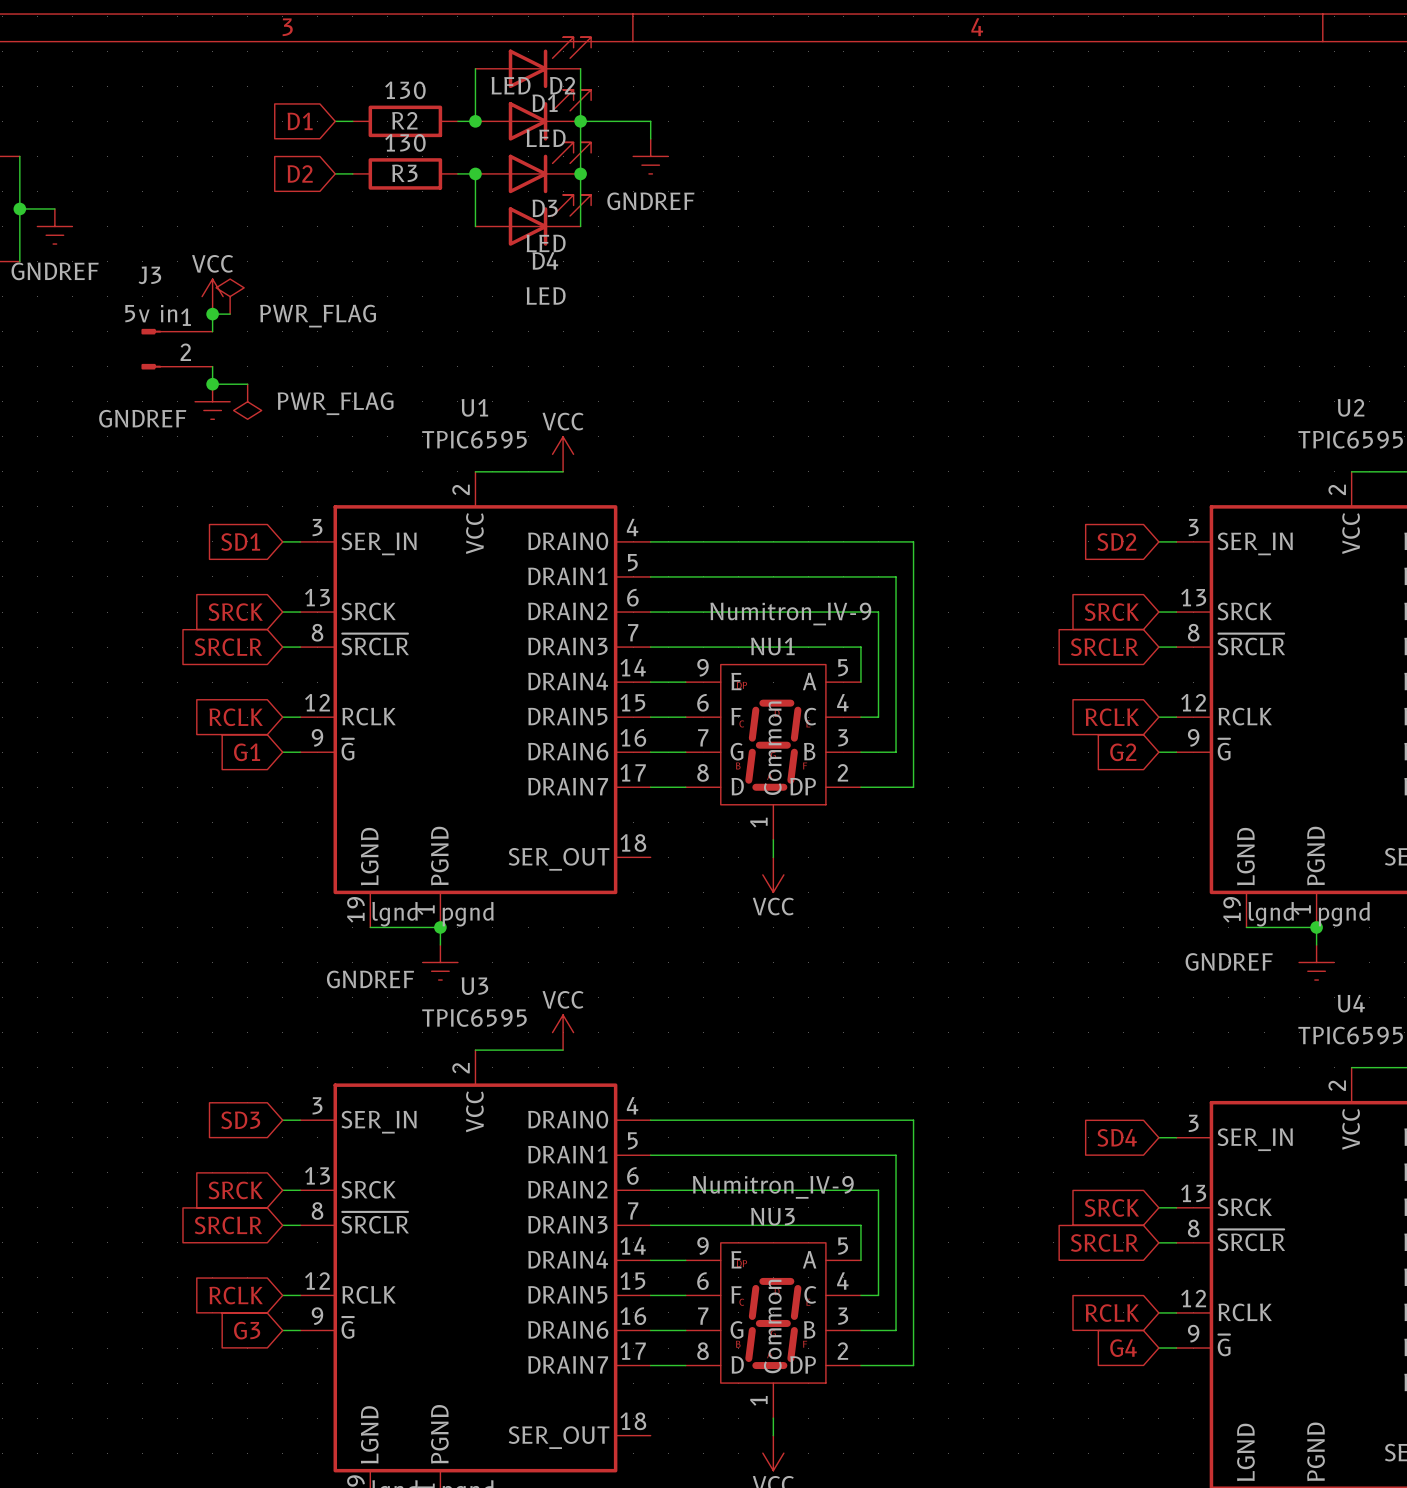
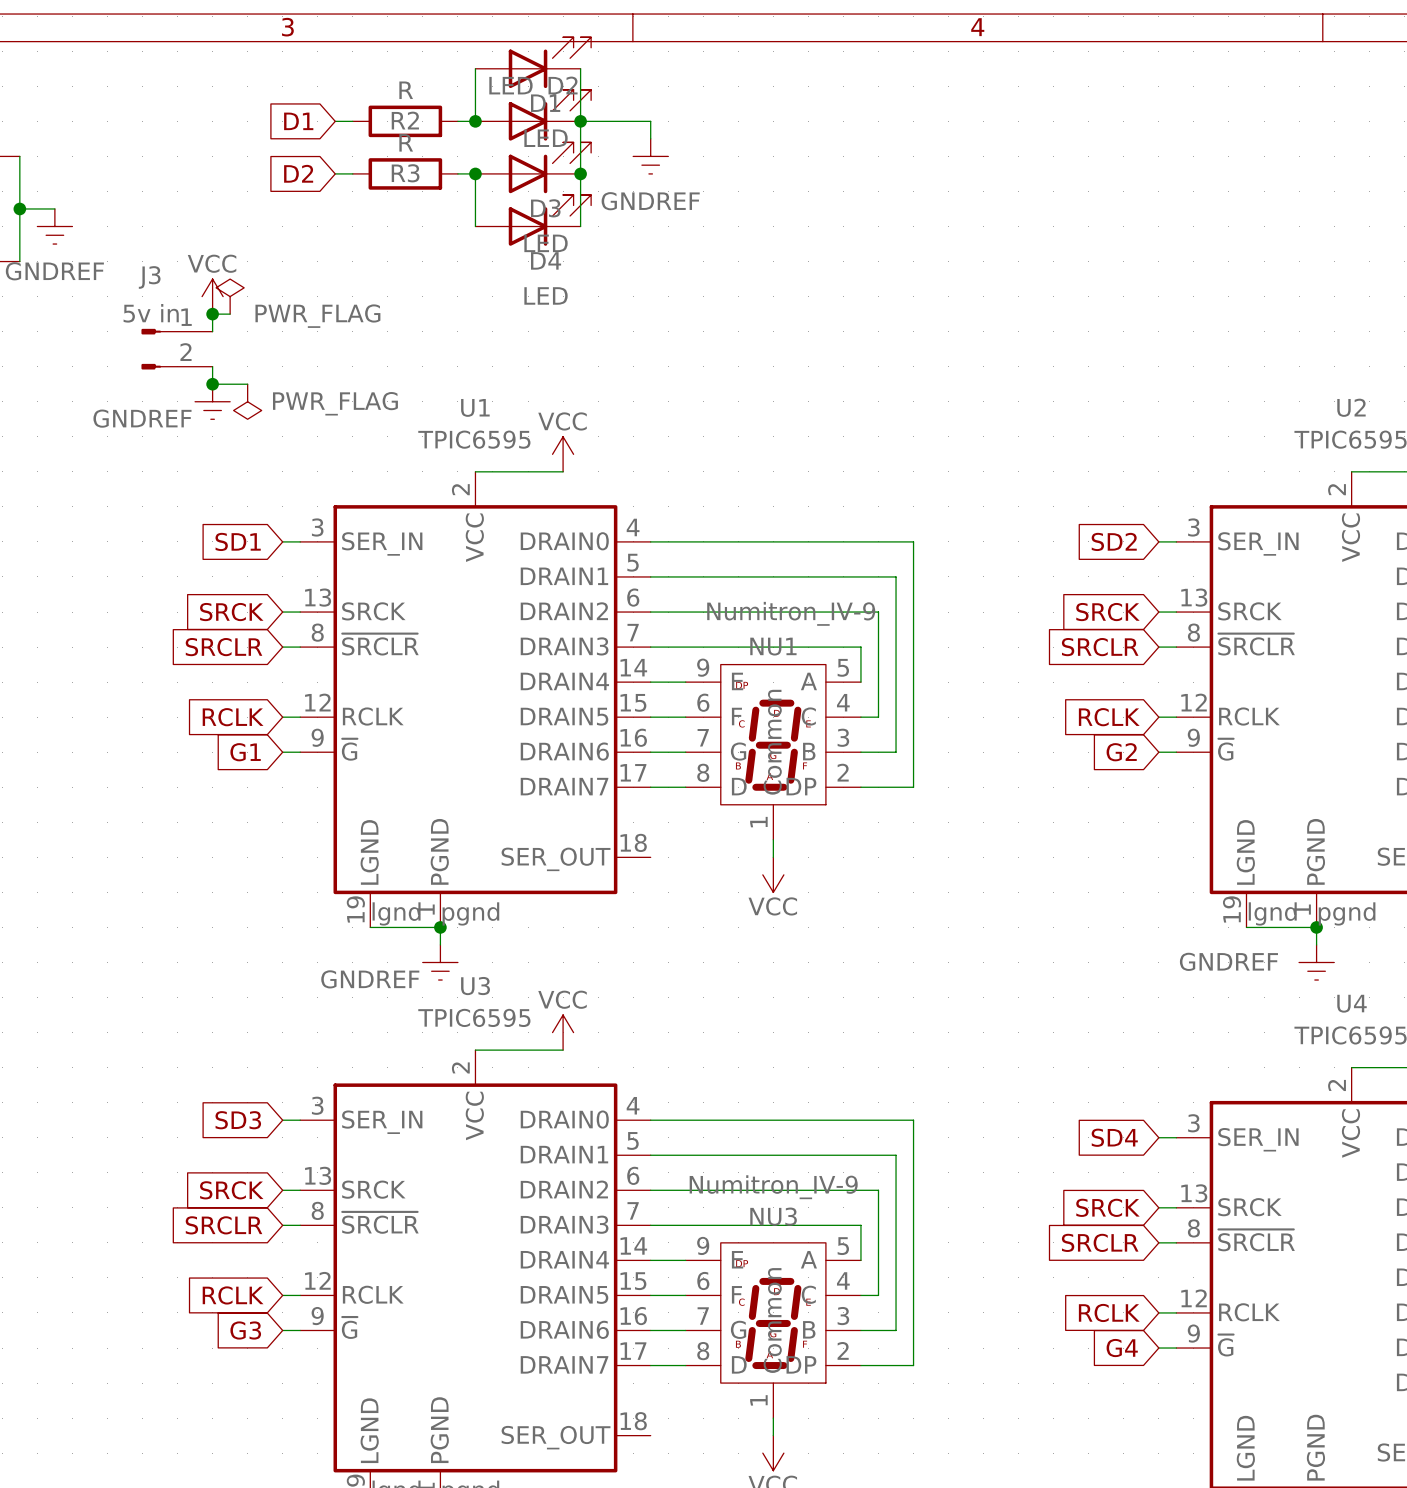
R2 value: 130 (405, 90) -> R (406, 90)
R3 value: 130 (405, 142) -> R (406, 142)

